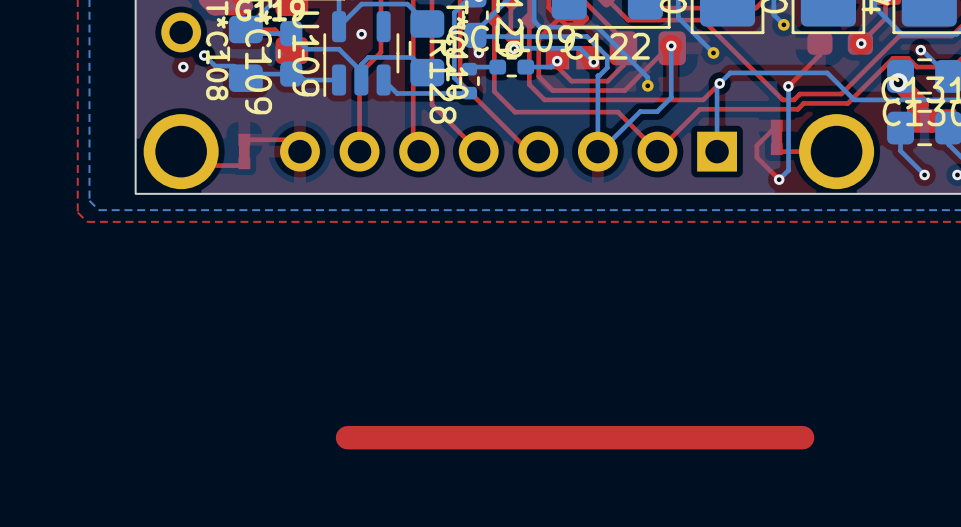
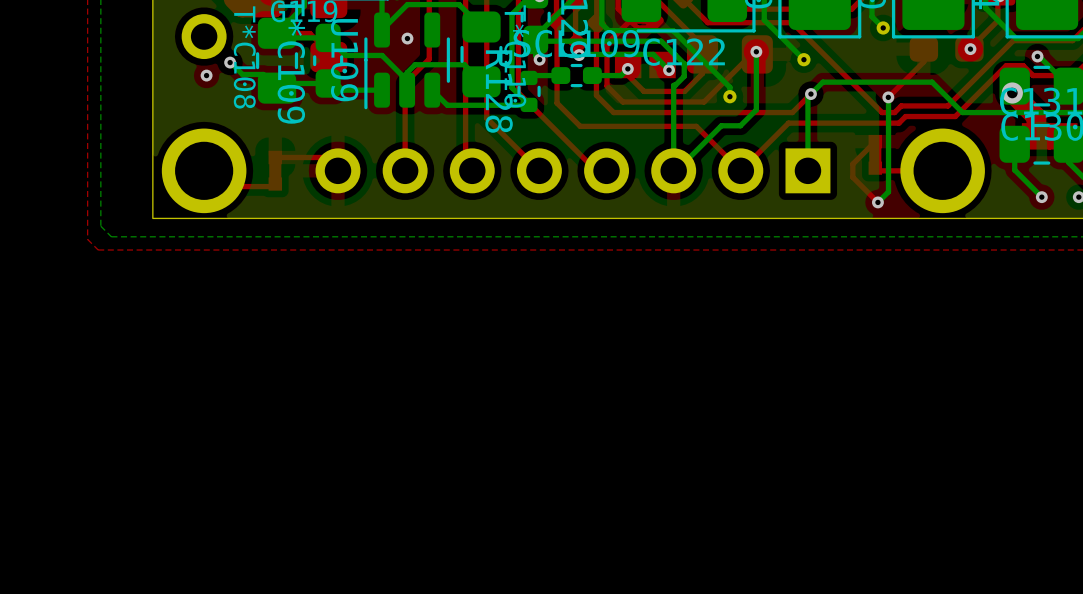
top track: (802, 437) (347, 437) -> none

